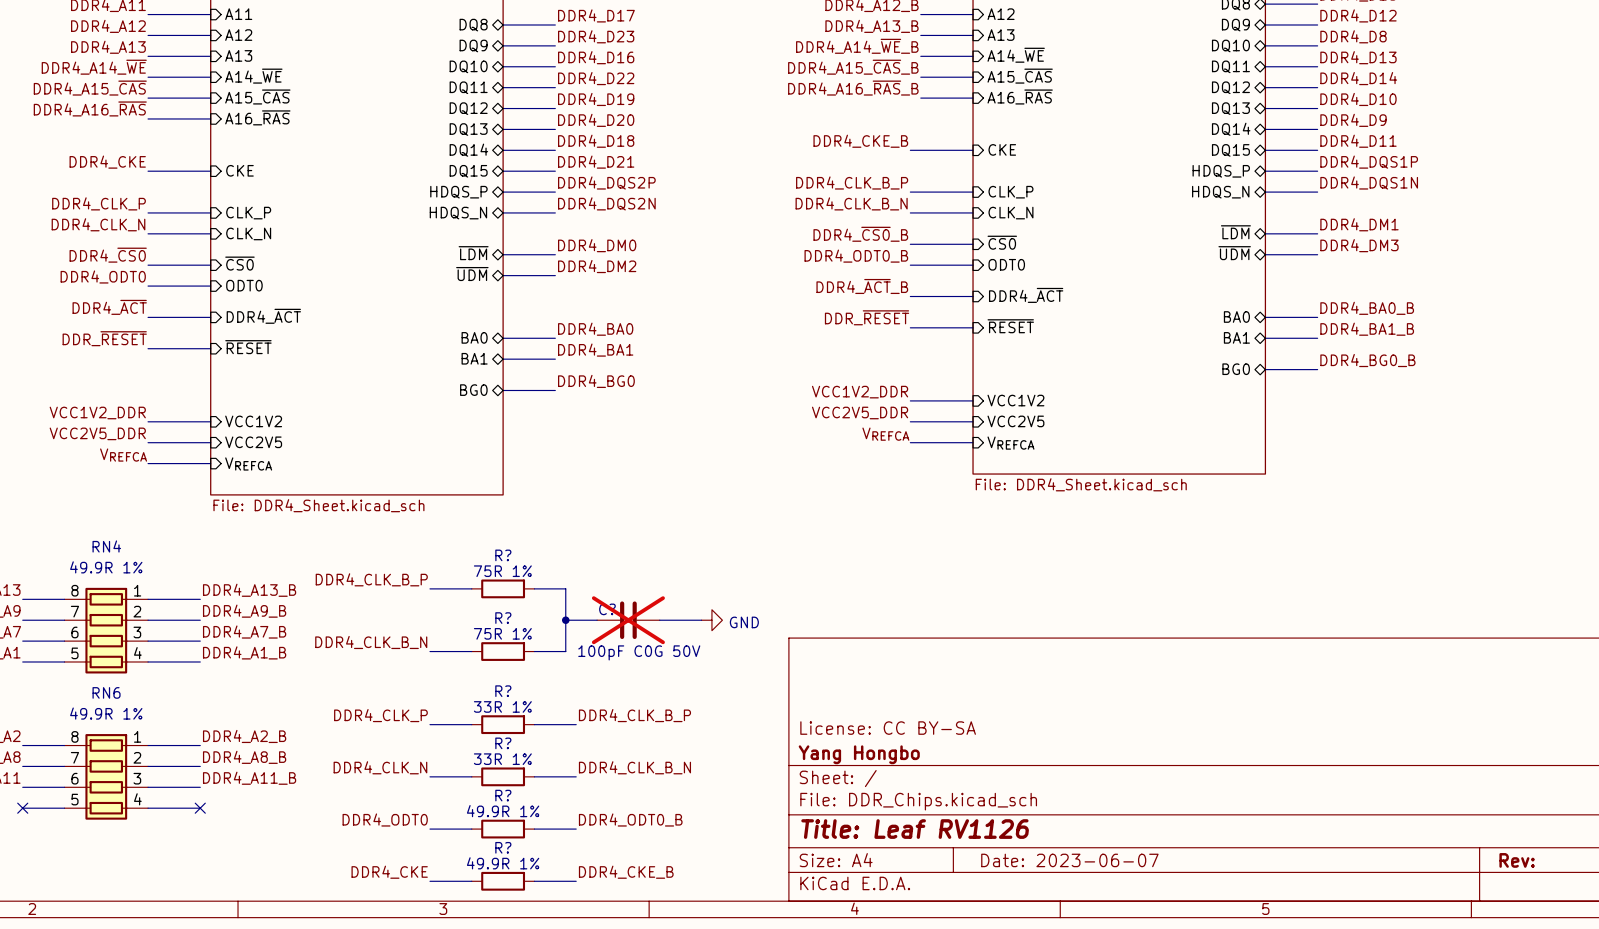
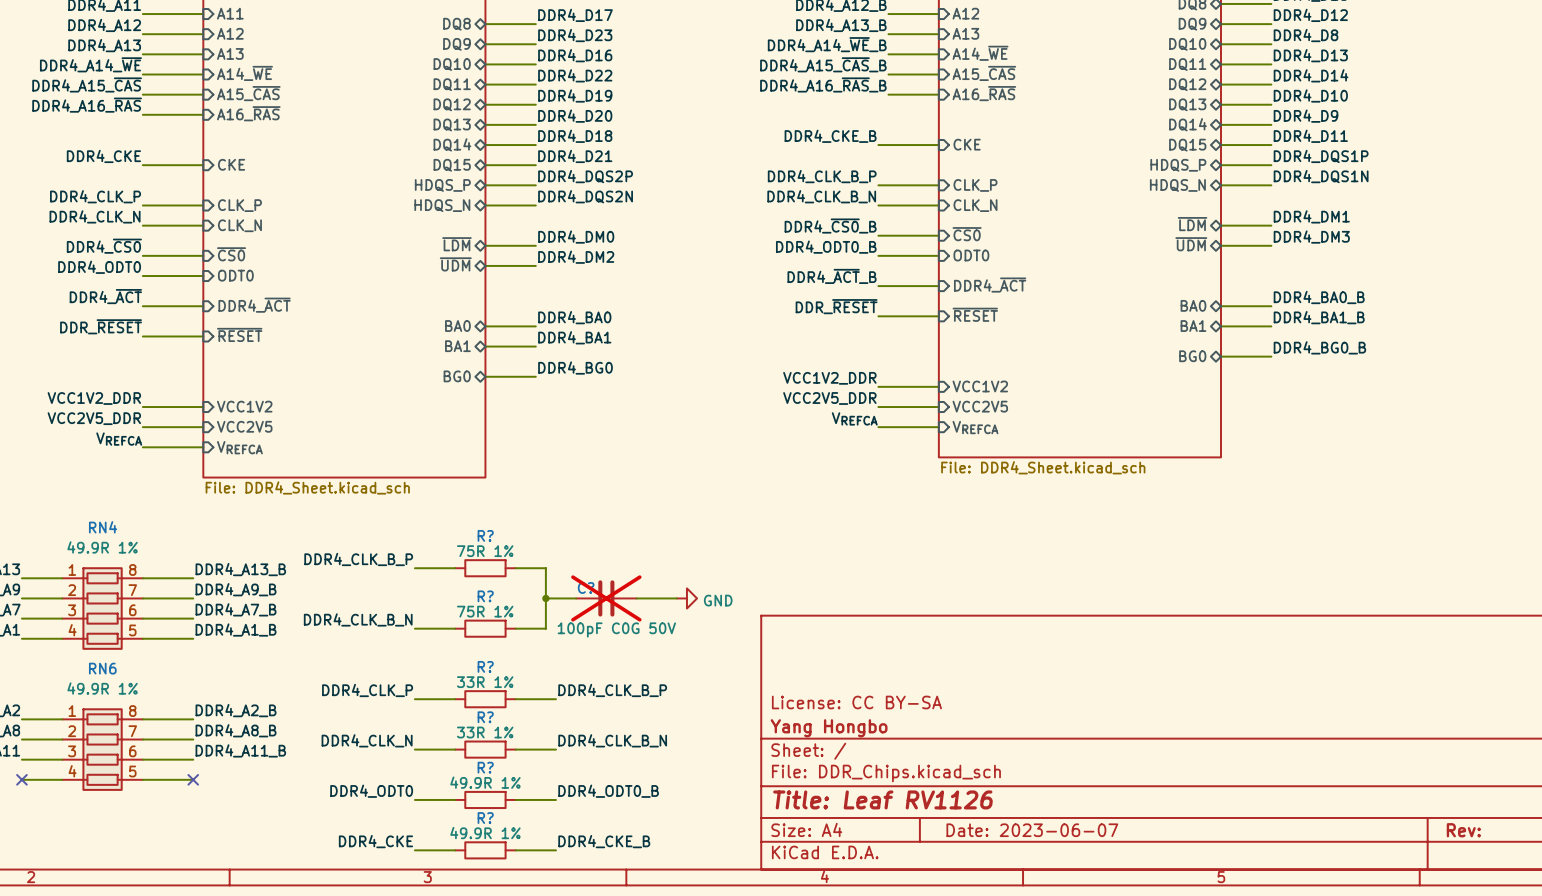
RN4 flip: as is (106, 630) -> left-right (102, 608)
RN6 flip: as is (106, 776) -> left-right (102, 749)

